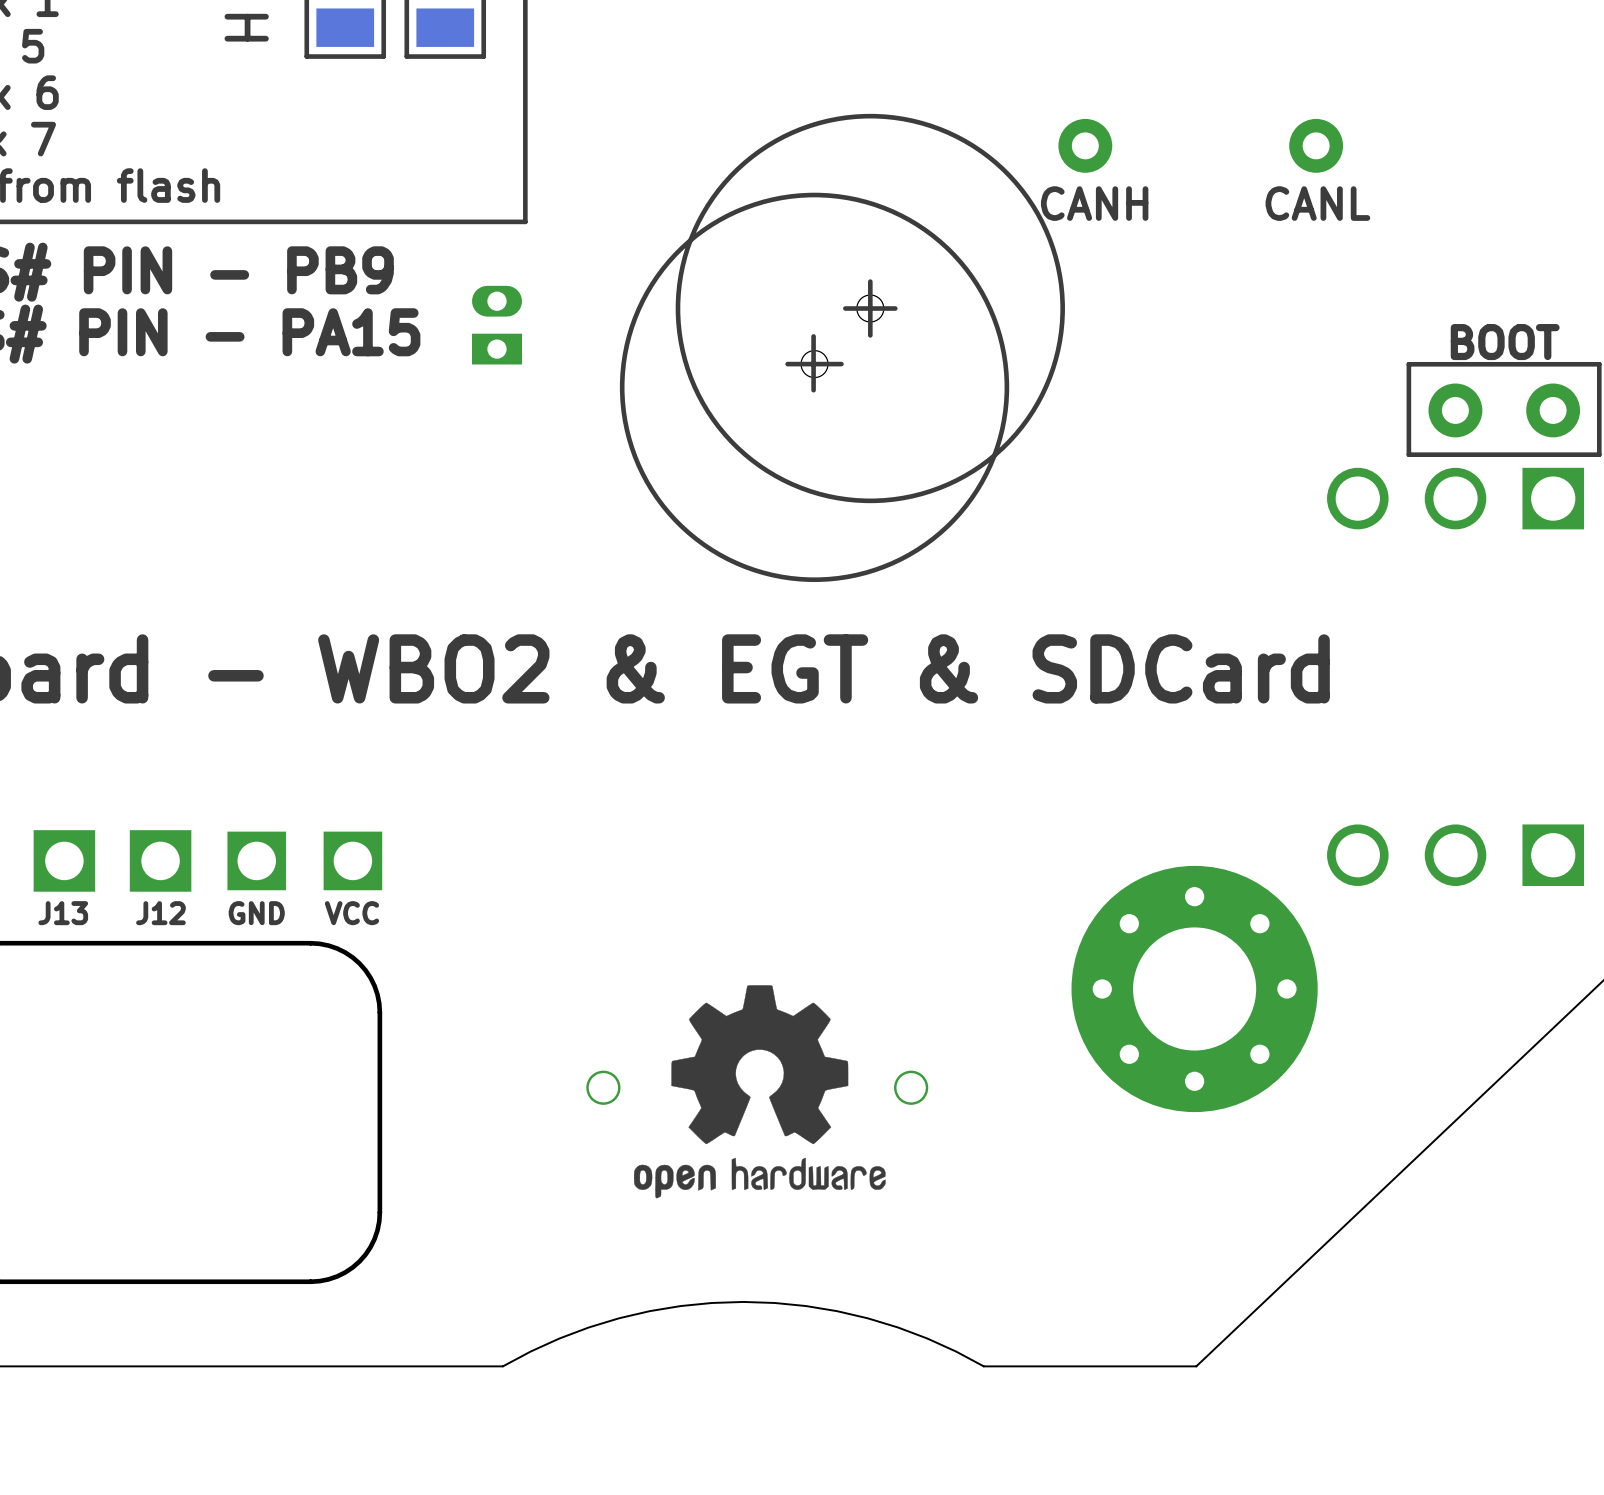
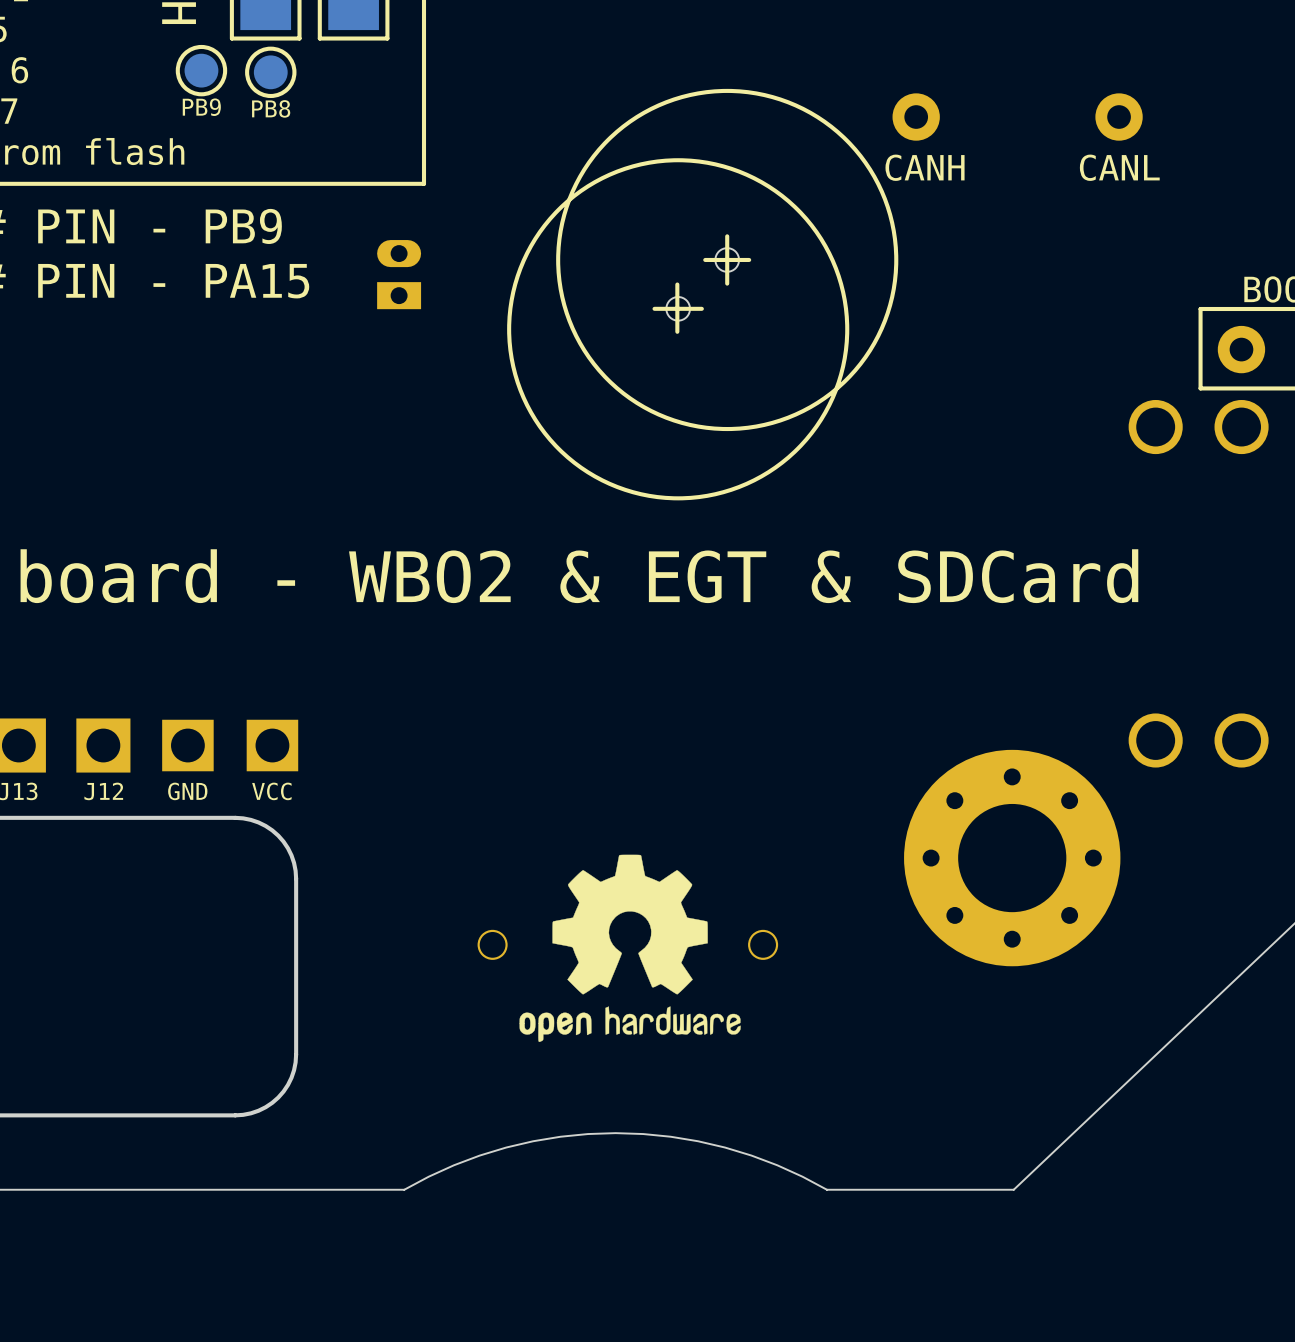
PB9: none -> (201, 70)
PB8: none -> (270, 72)

